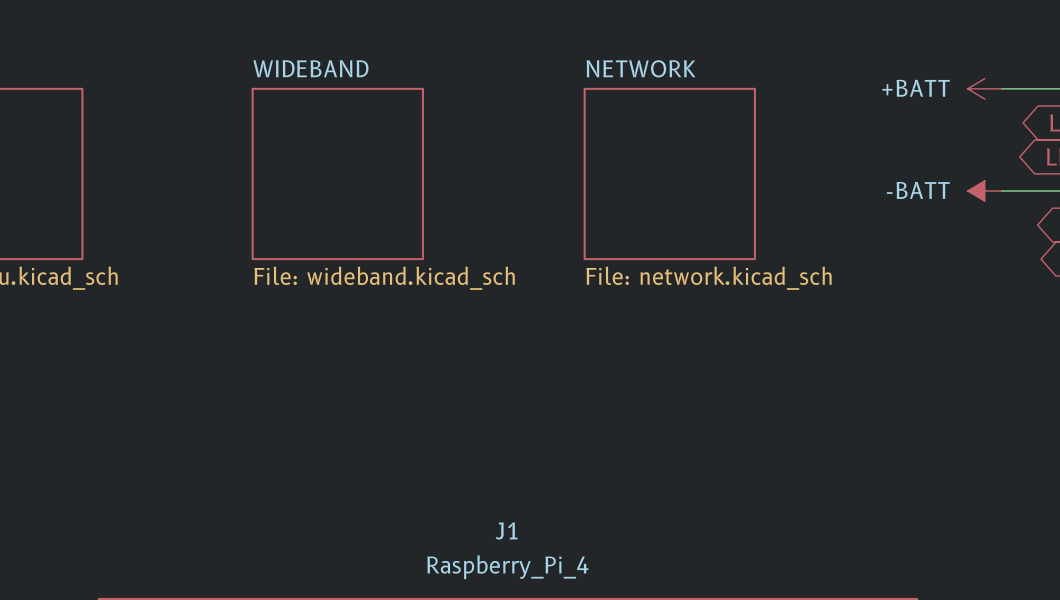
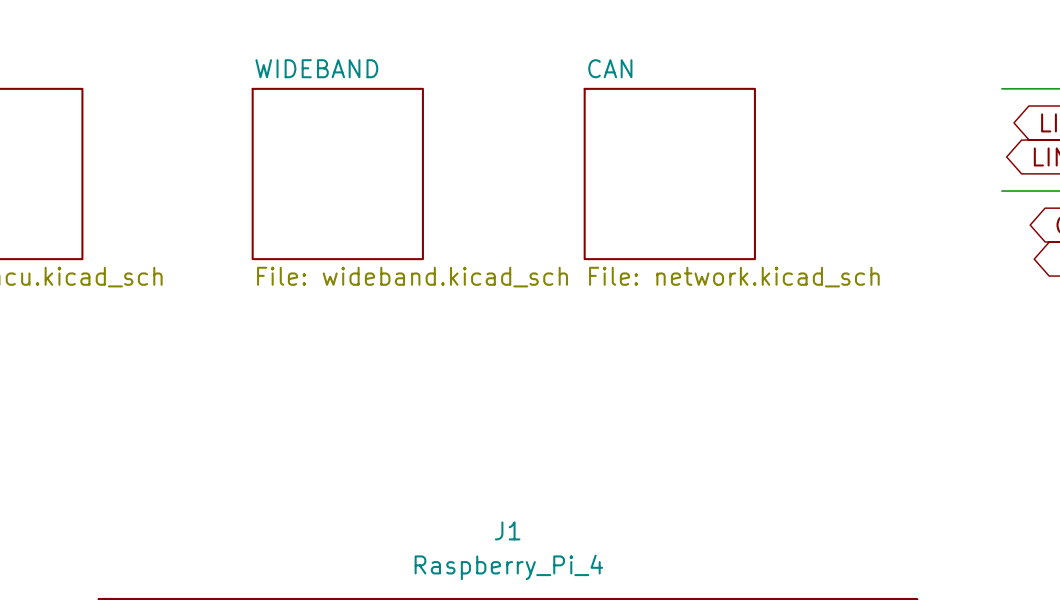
sheet NETWORK name: NETWORK (641, 68) -> CAN (610, 68)
power symbol: +BATT (984, 88) -> none
power symbol: -BATT (984, 191) -> none

